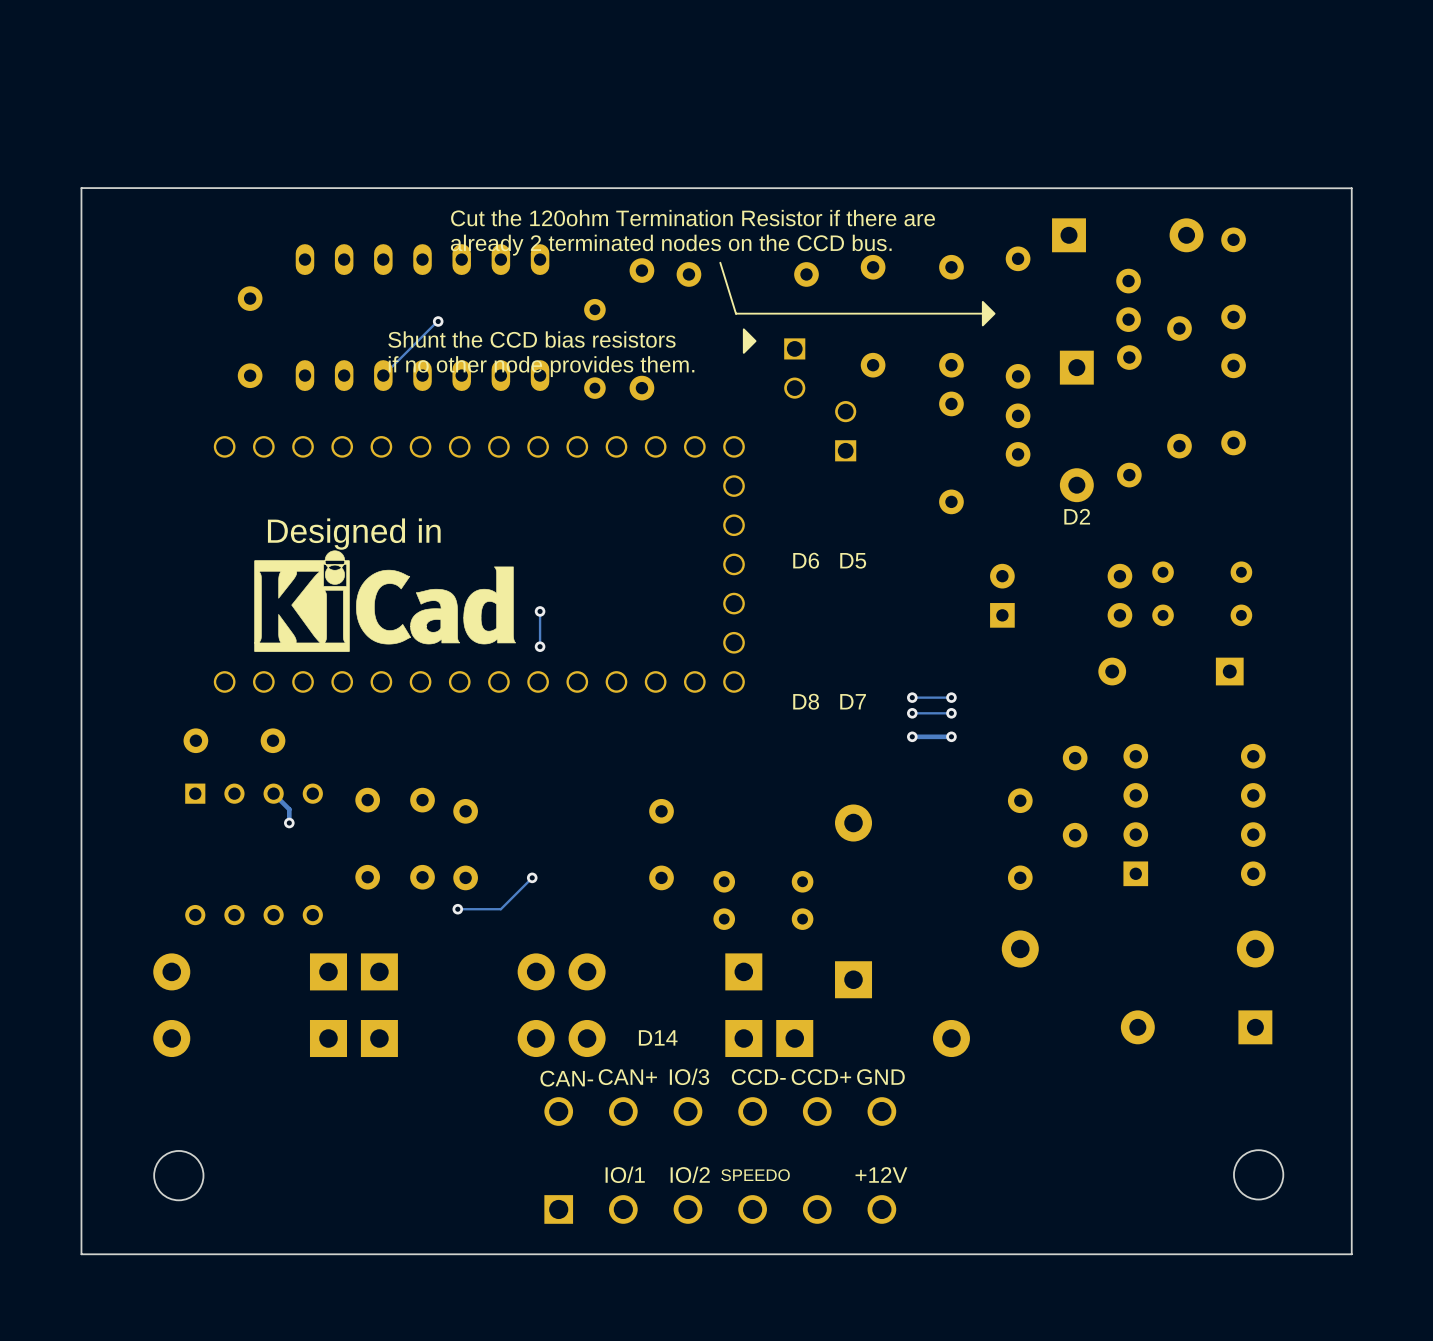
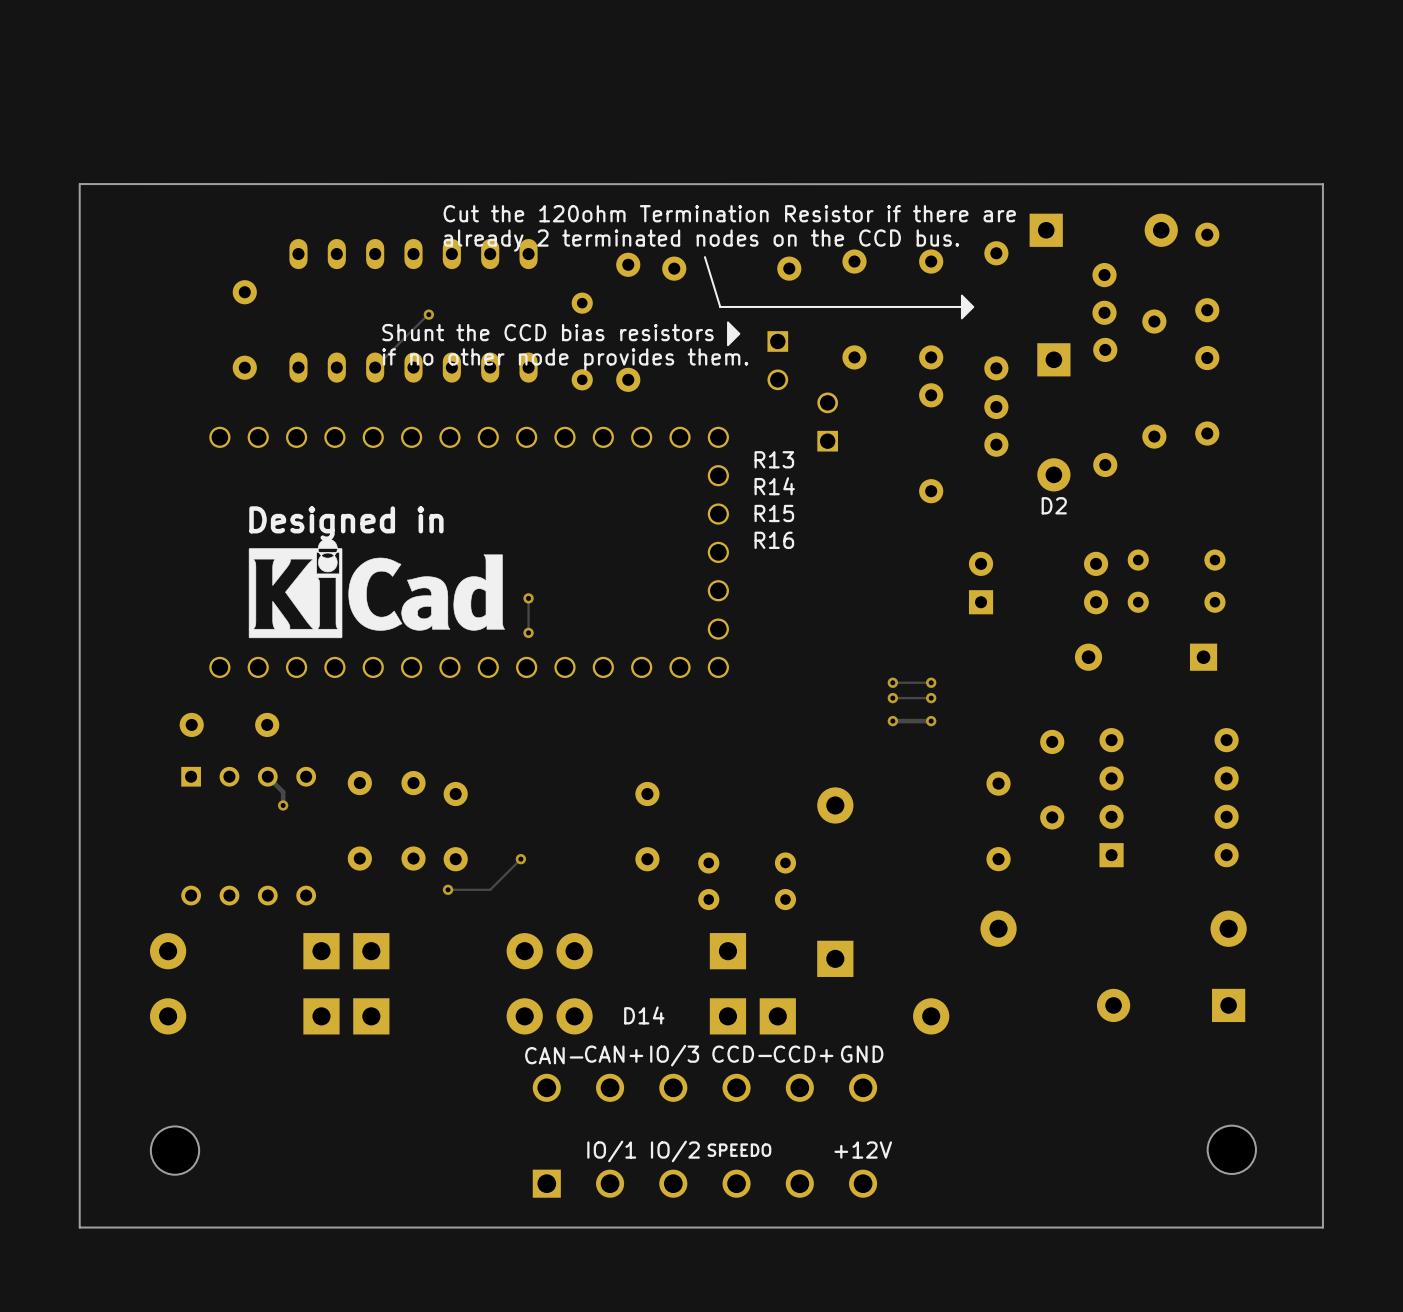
R13: none -> (774, 459)
R14: none -> (774, 486)
R15: none -> (774, 513)
R16: none -> (774, 540)
D6: (806, 560) -> none
D5: (853, 560) -> none
D8: (806, 701) -> none
D7: (853, 701) -> none

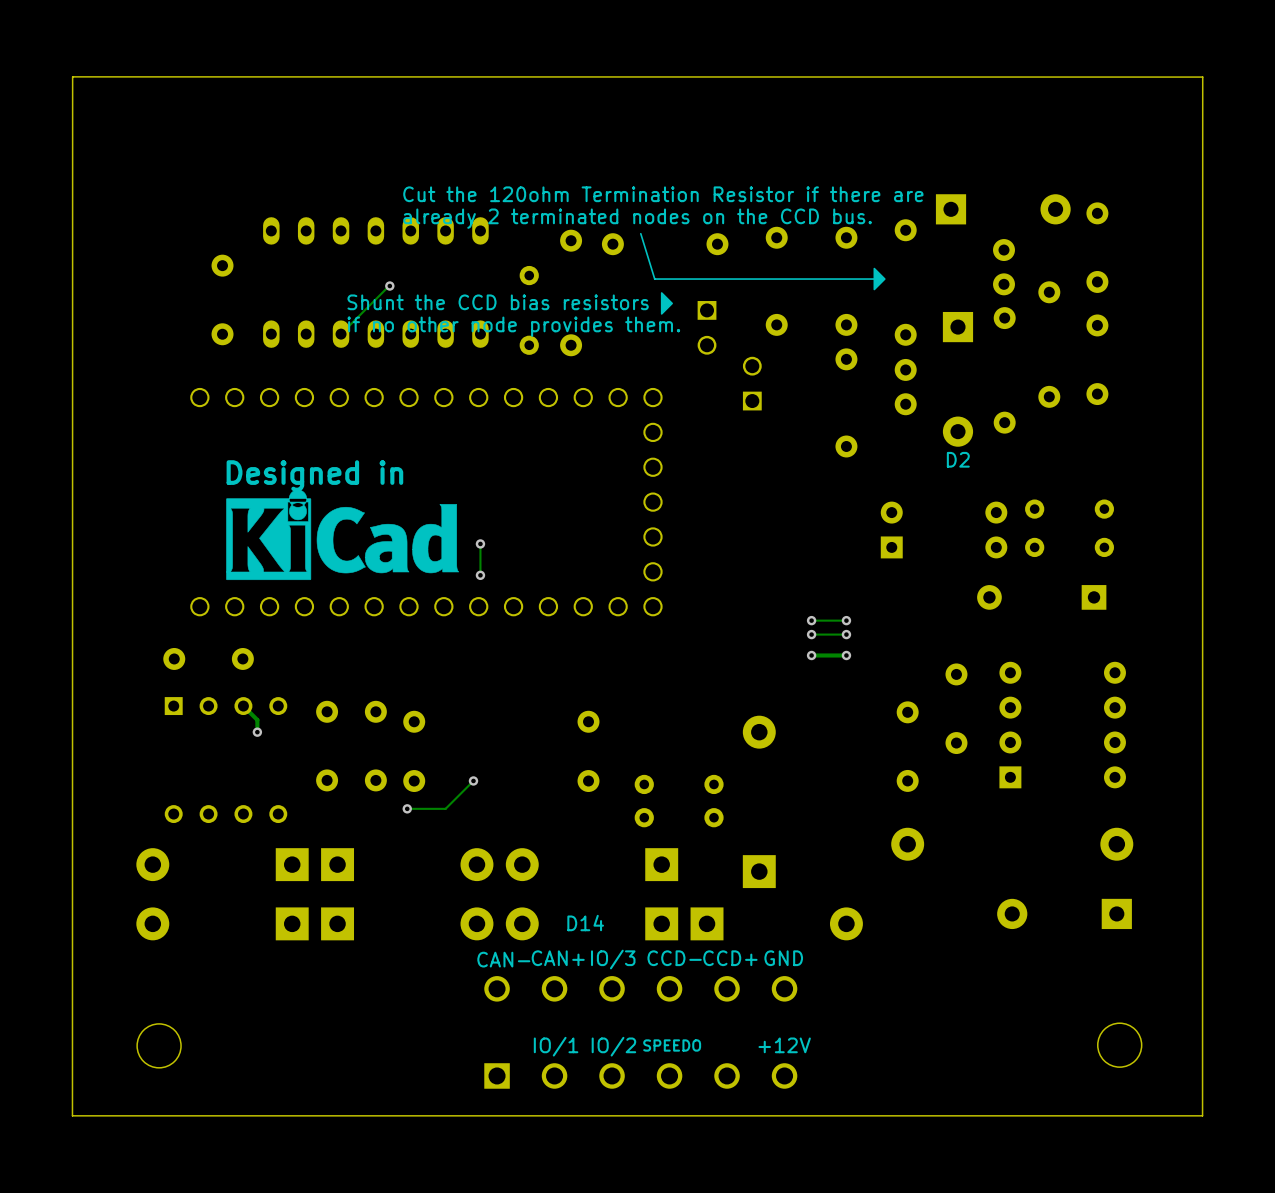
R13: (774, 459) -> none
R14: (774, 486) -> none
R15: (774, 513) -> none
R16: (774, 540) -> none
board edge: (1322, 1227) (1322, 184) (79, 184) (79, 1227) -> (1202, 1115) (1202, 77) (72, 76) (72, 1115)

